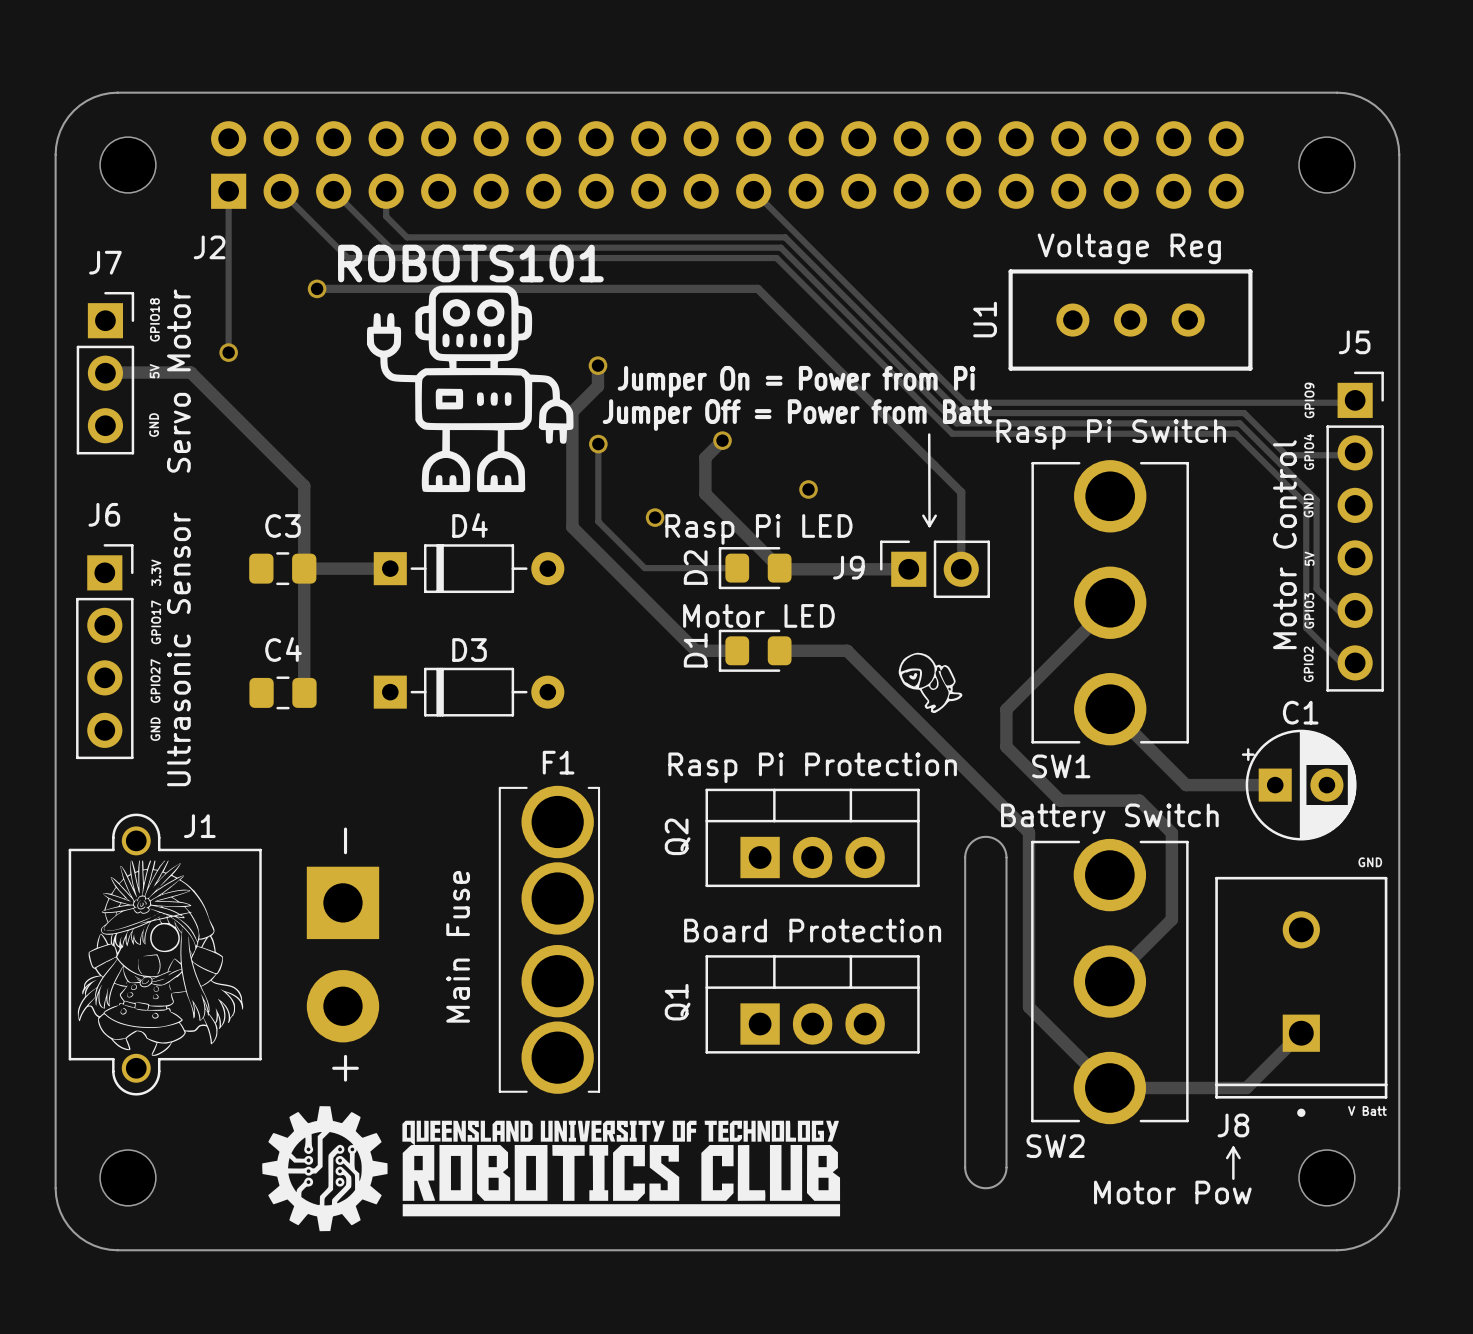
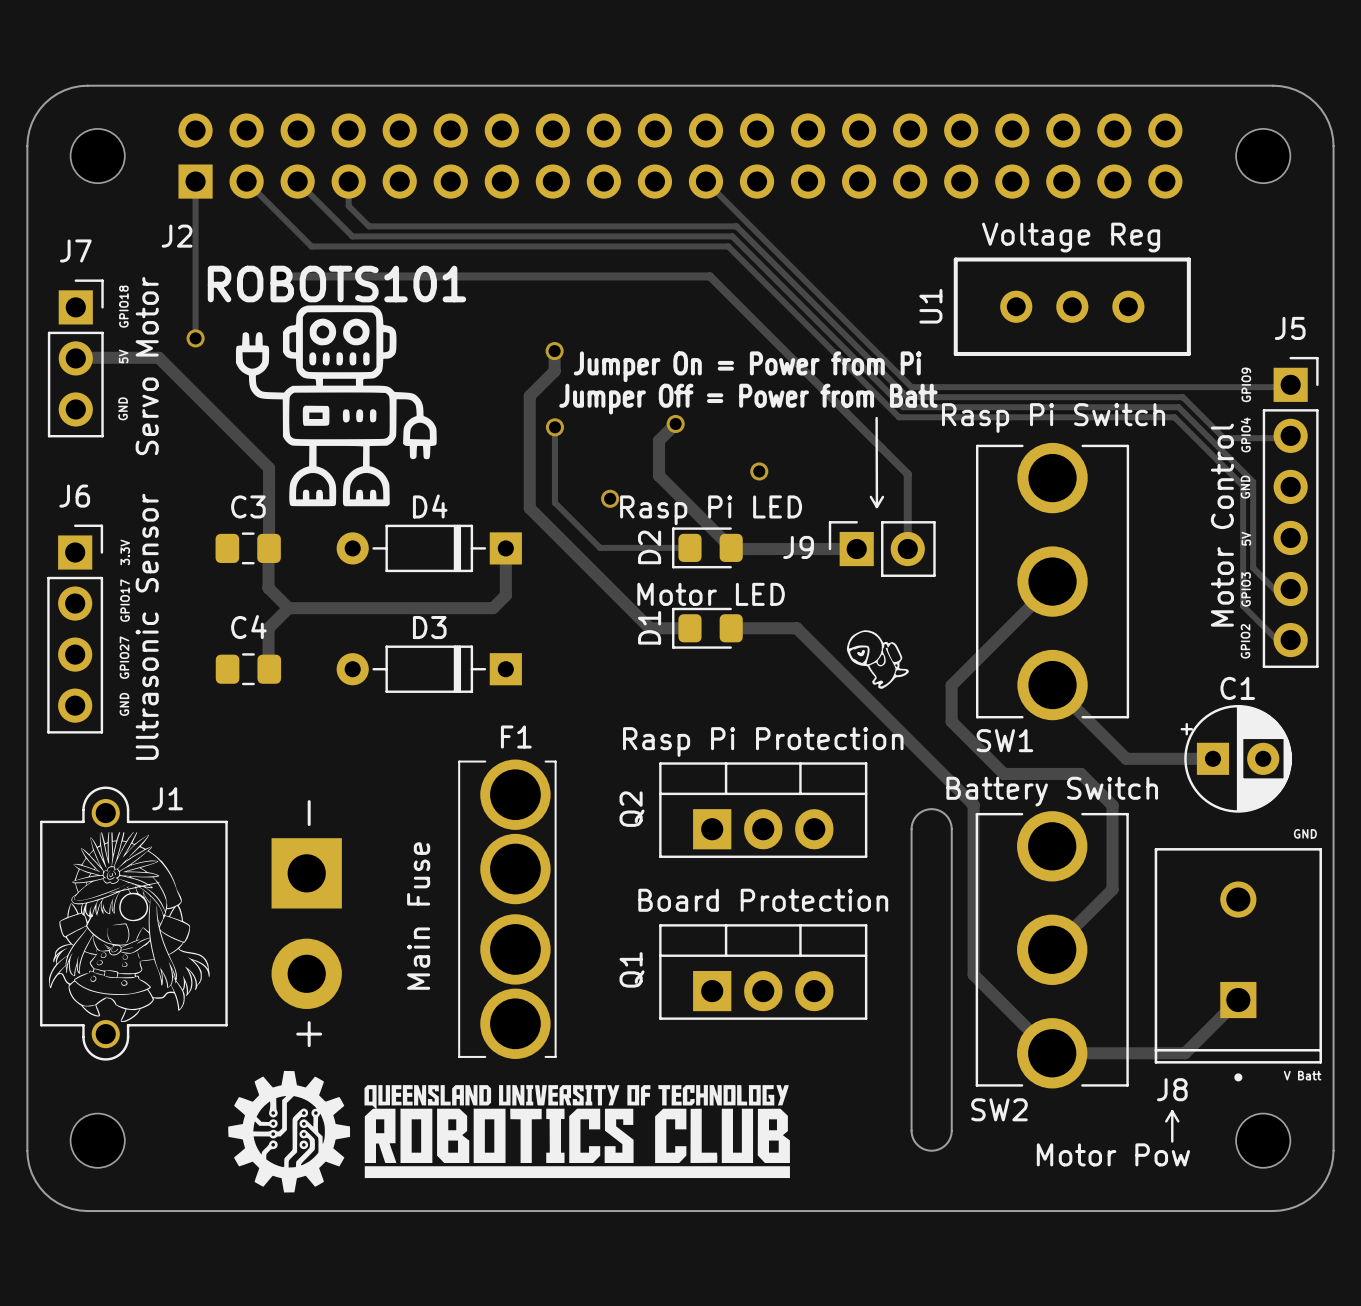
ROBOTS101 position: (470, 388) -> (336, 405)
track: none -> (269, 548) (268, 588) (288, 608)
track: (390, 568) (304, 568) (304, 692) -> (288, 608) (268, 628) (269, 669)
D4 rotation: 0° (469, 568) -> 180° (429, 548)
track: none -> (505, 548) (505, 595) (493, 608) (288, 608)
D3 rotation: 0° (469, 692) -> 180° (429, 669)

